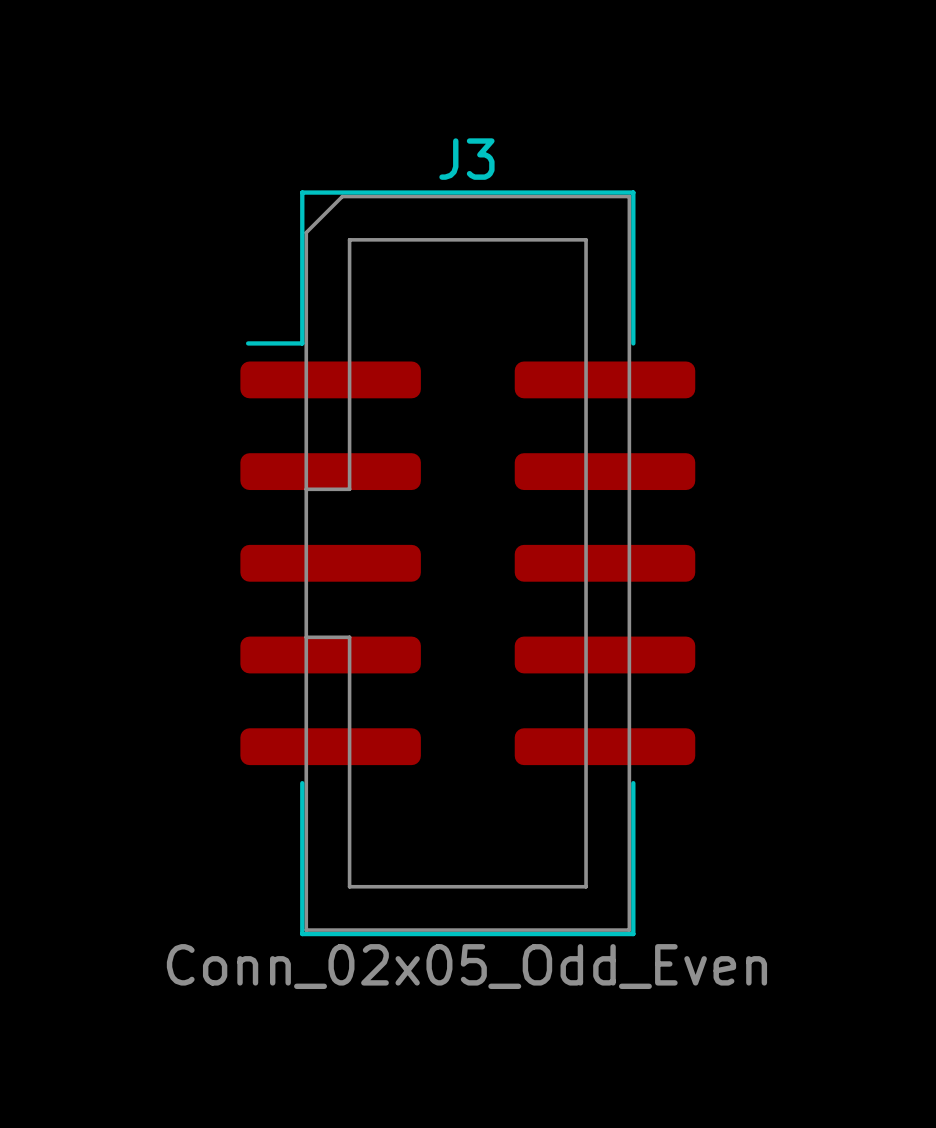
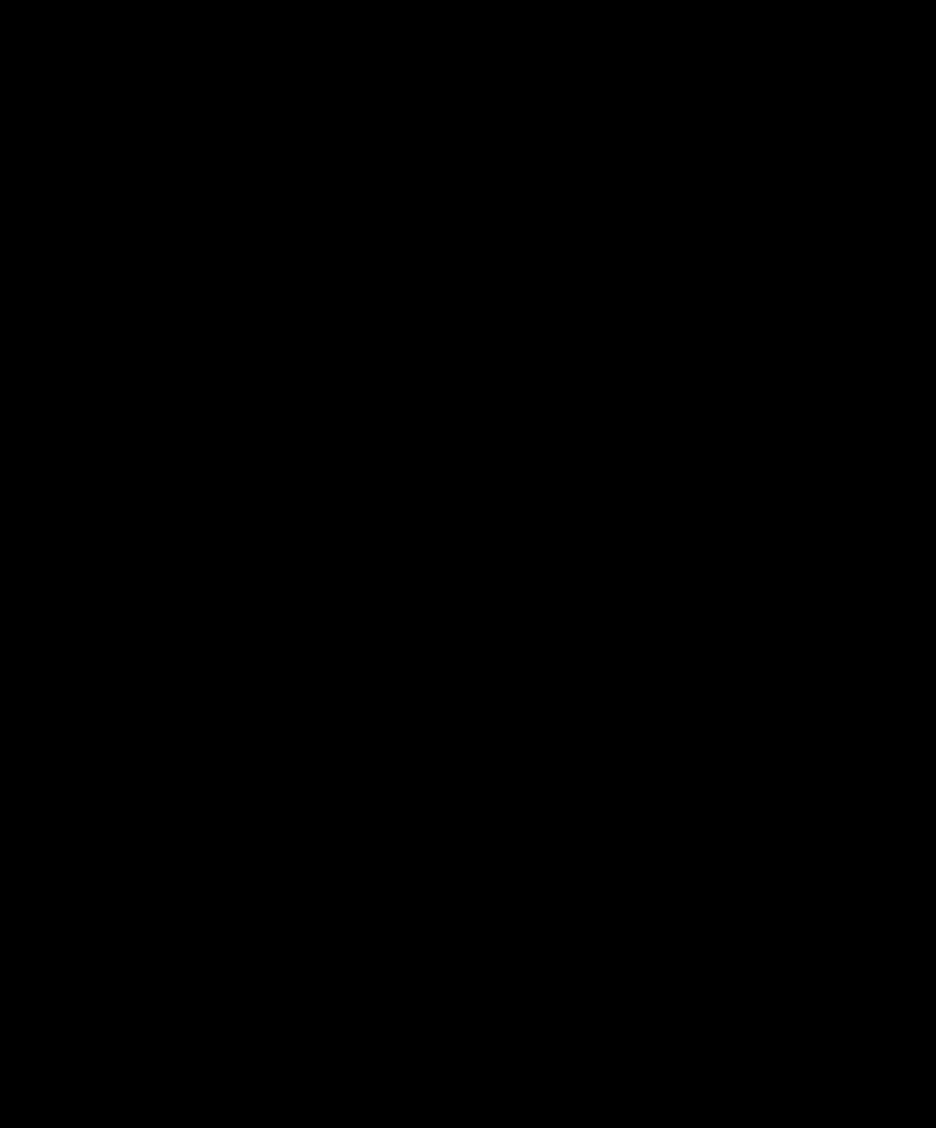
J3: Conn_02x05_Odd_Even (467, 563) -> none

